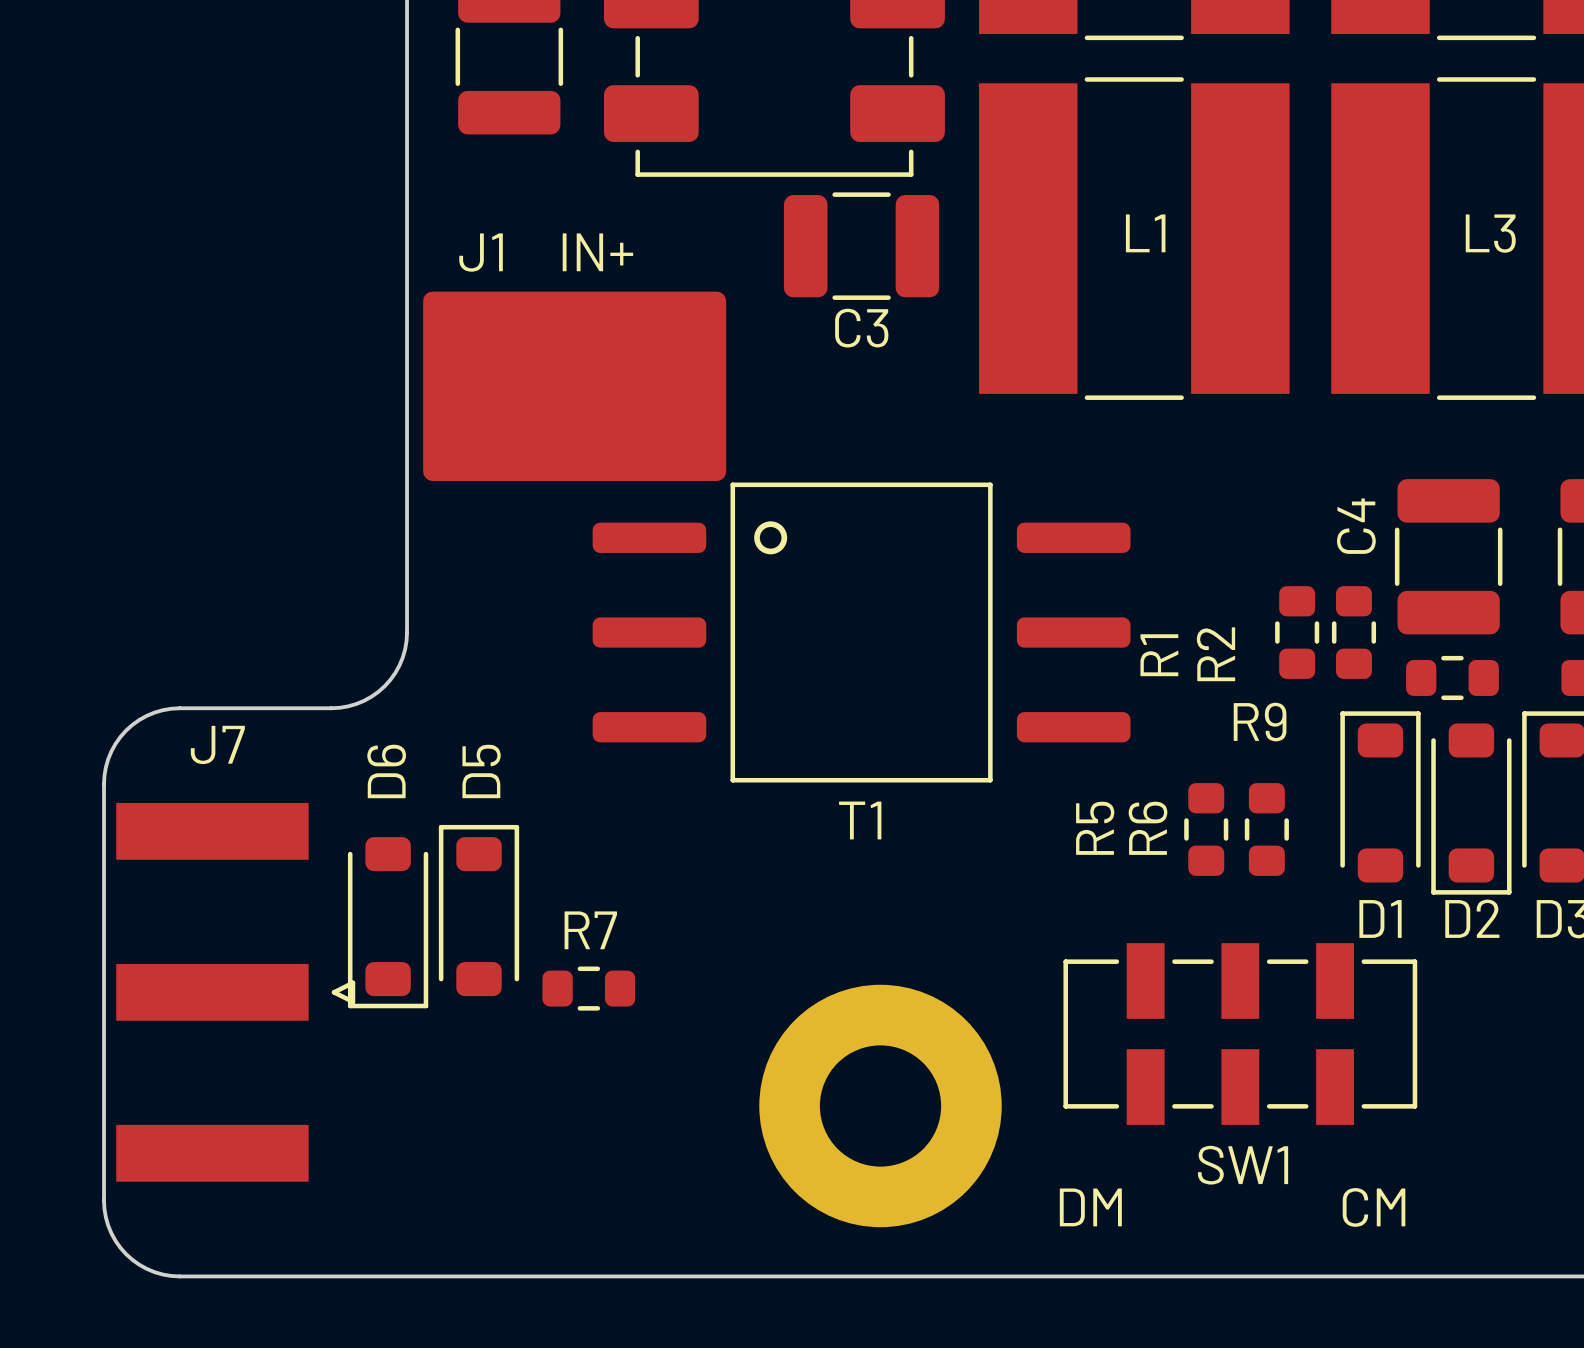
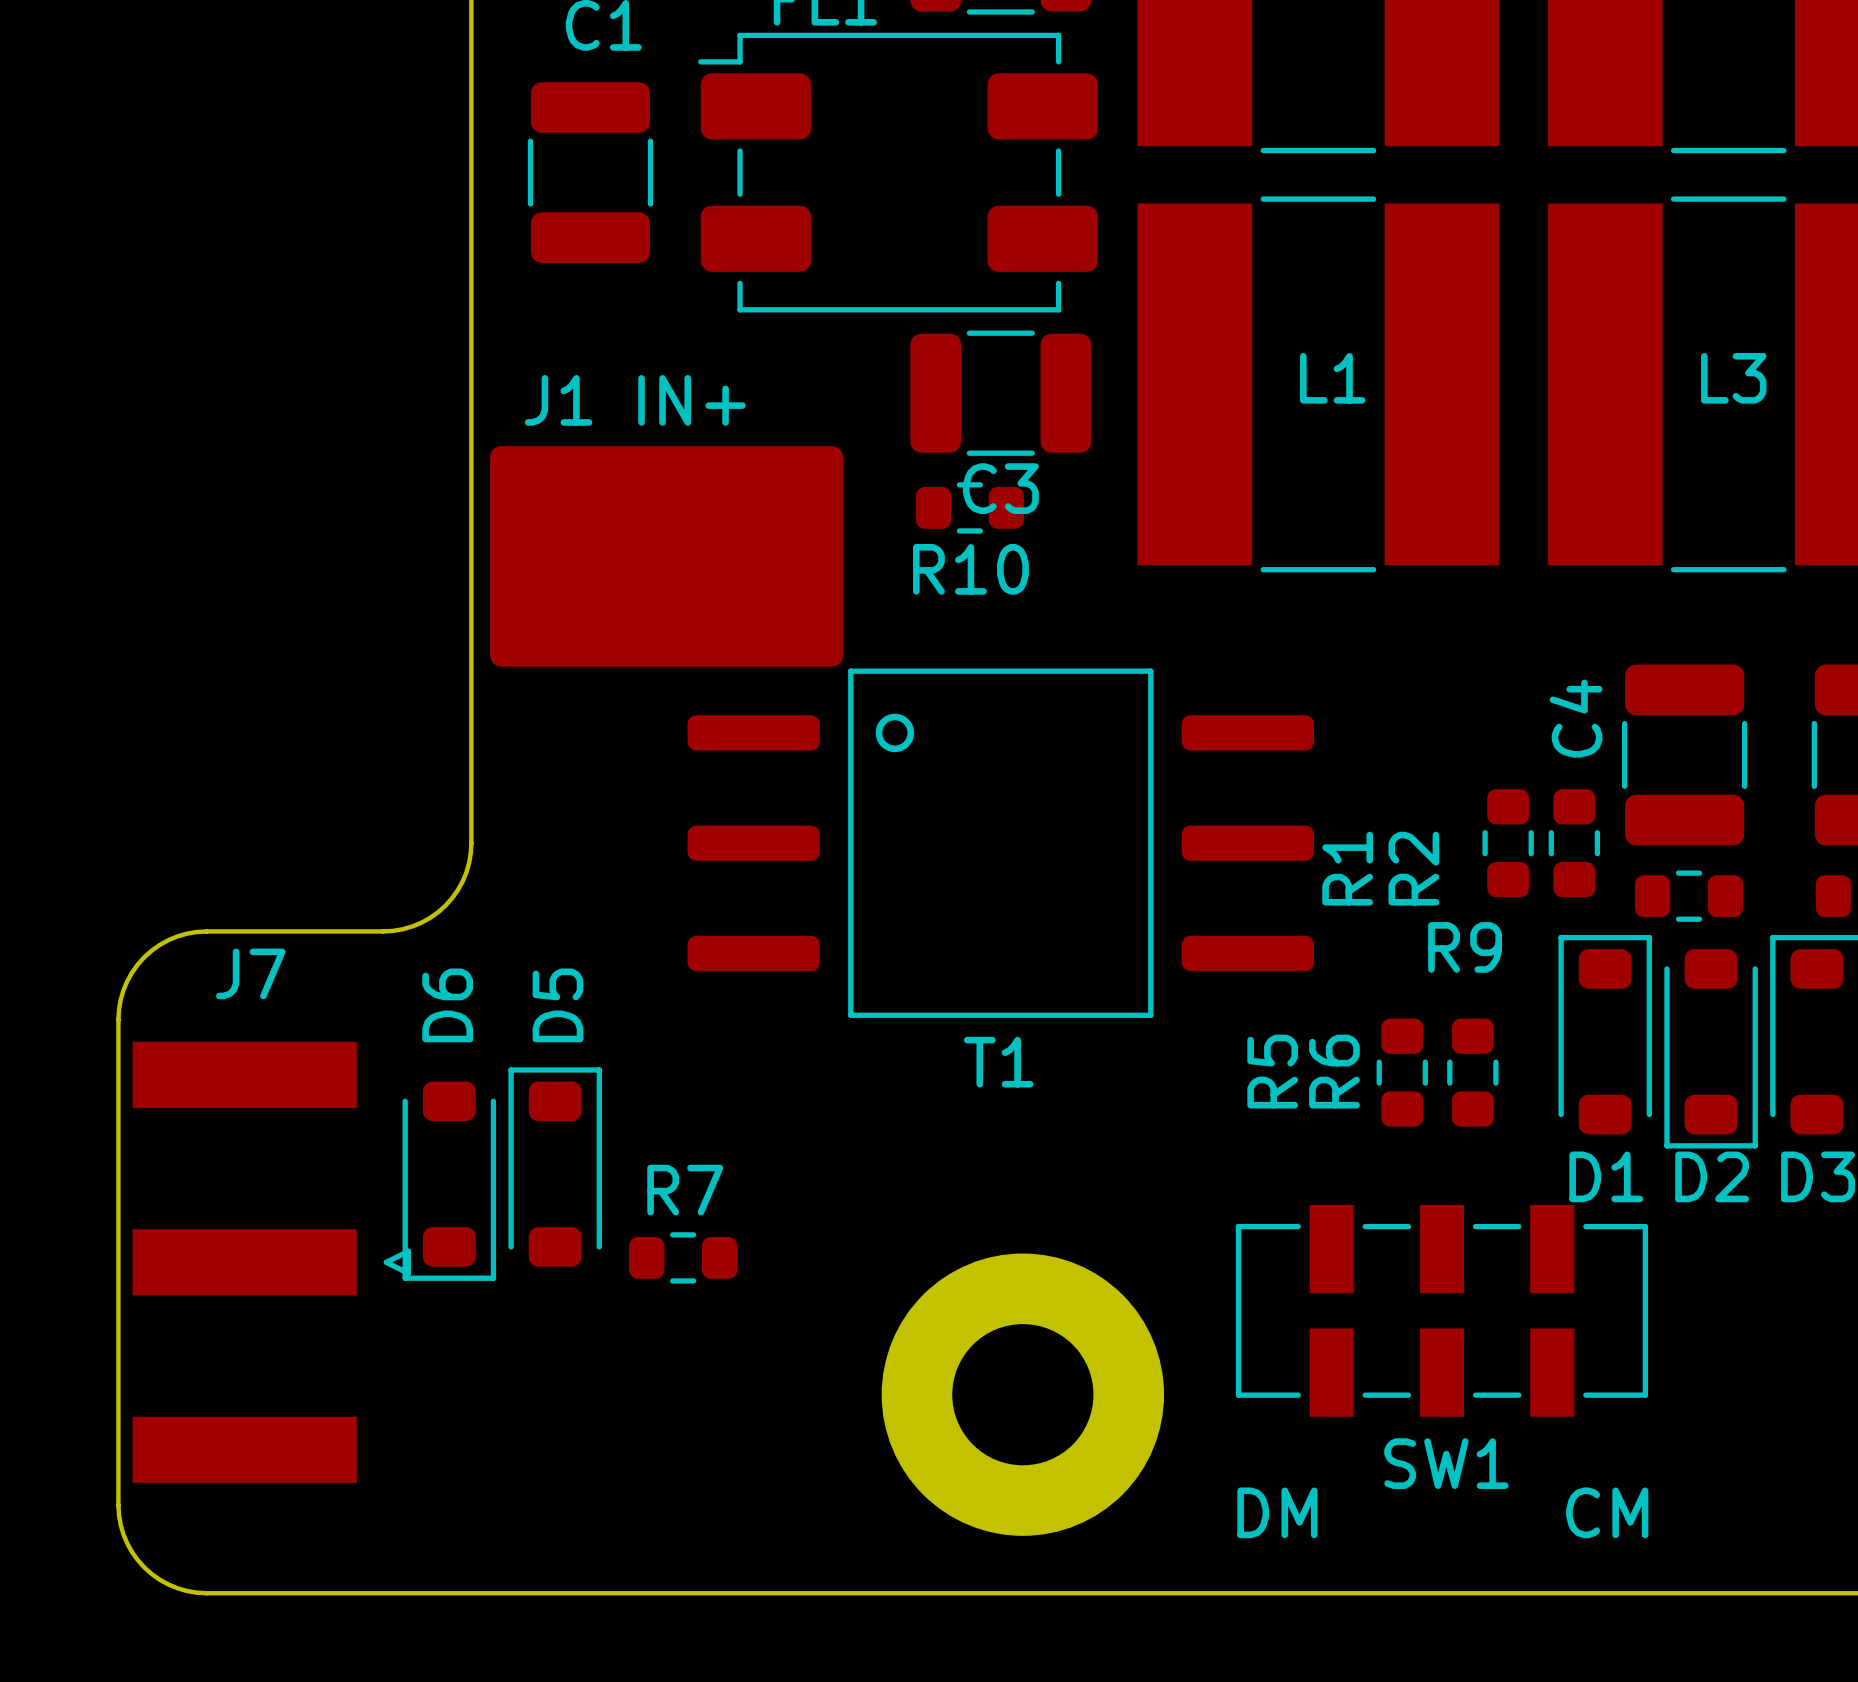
R10: none -> (969, 507)

